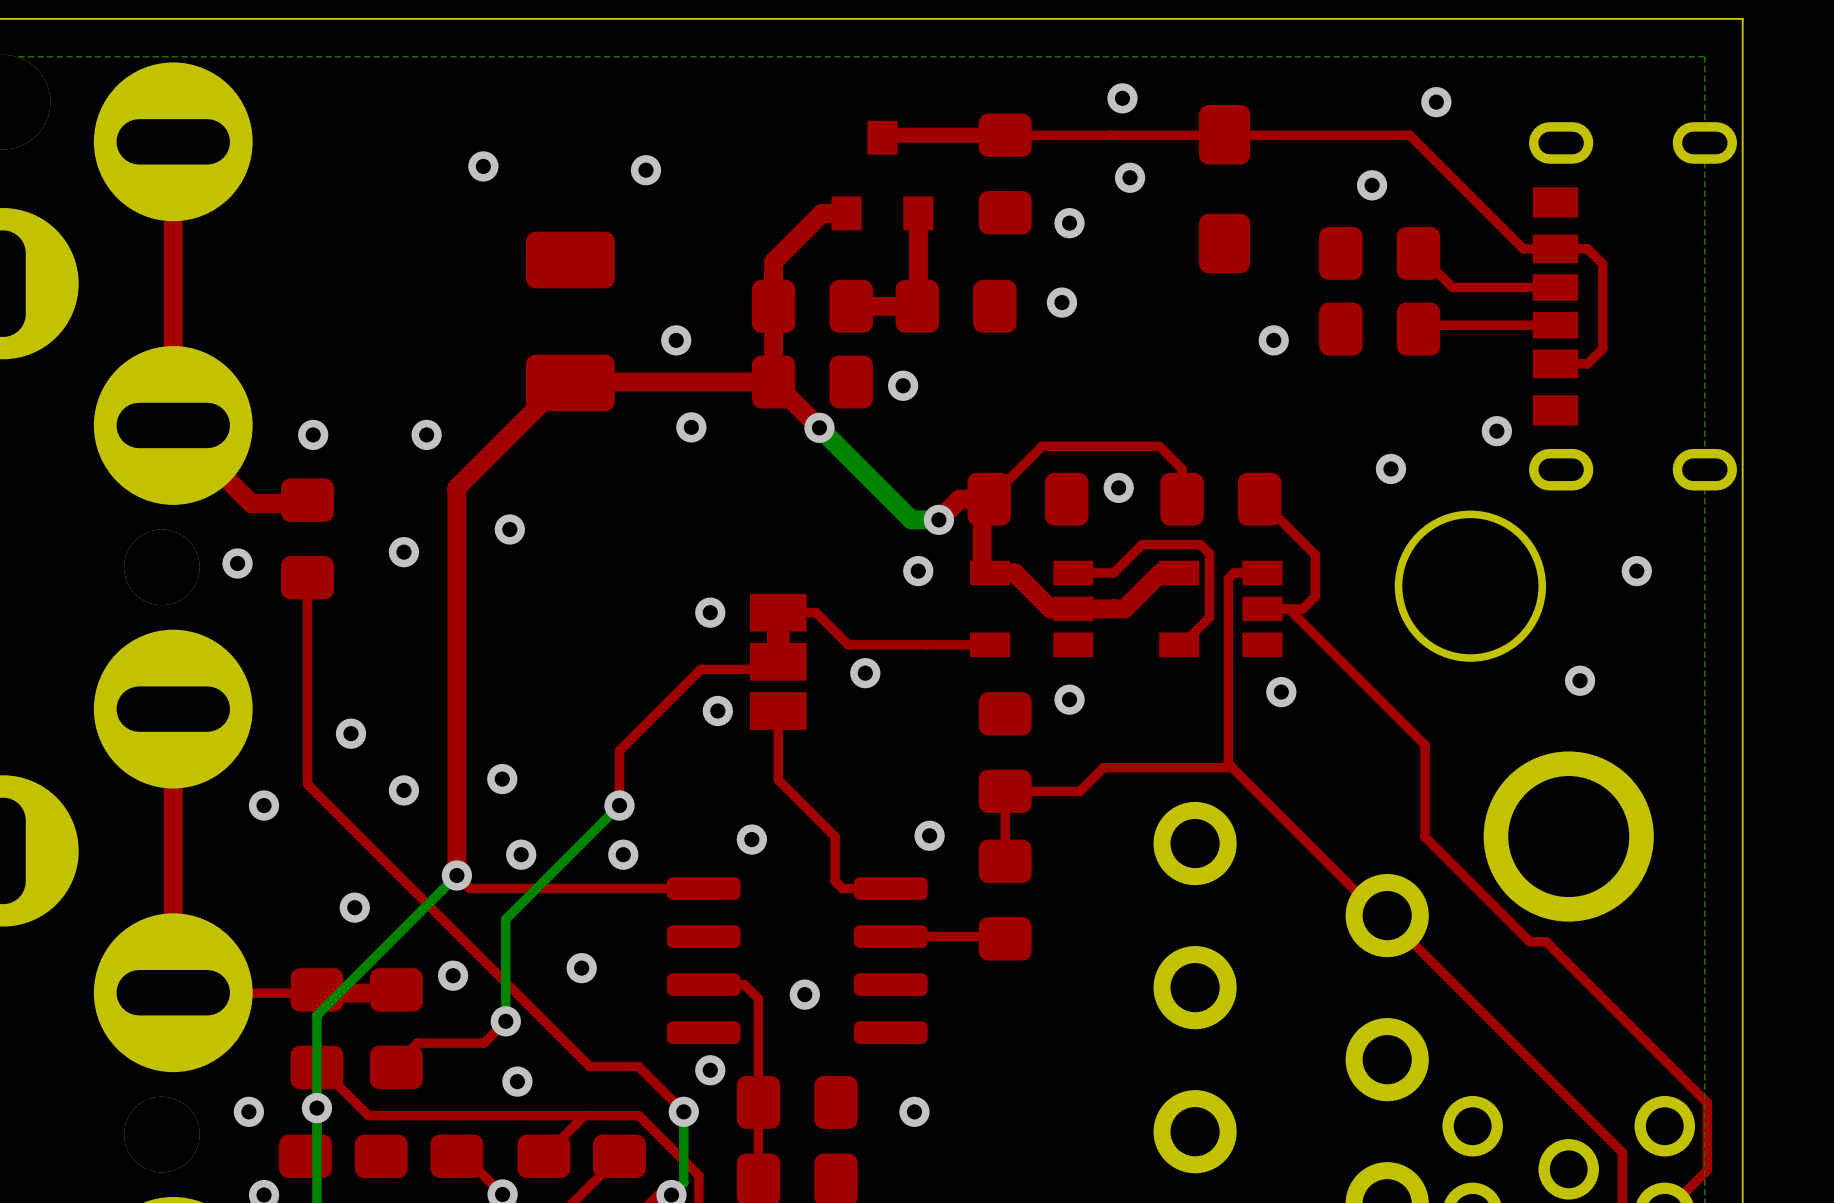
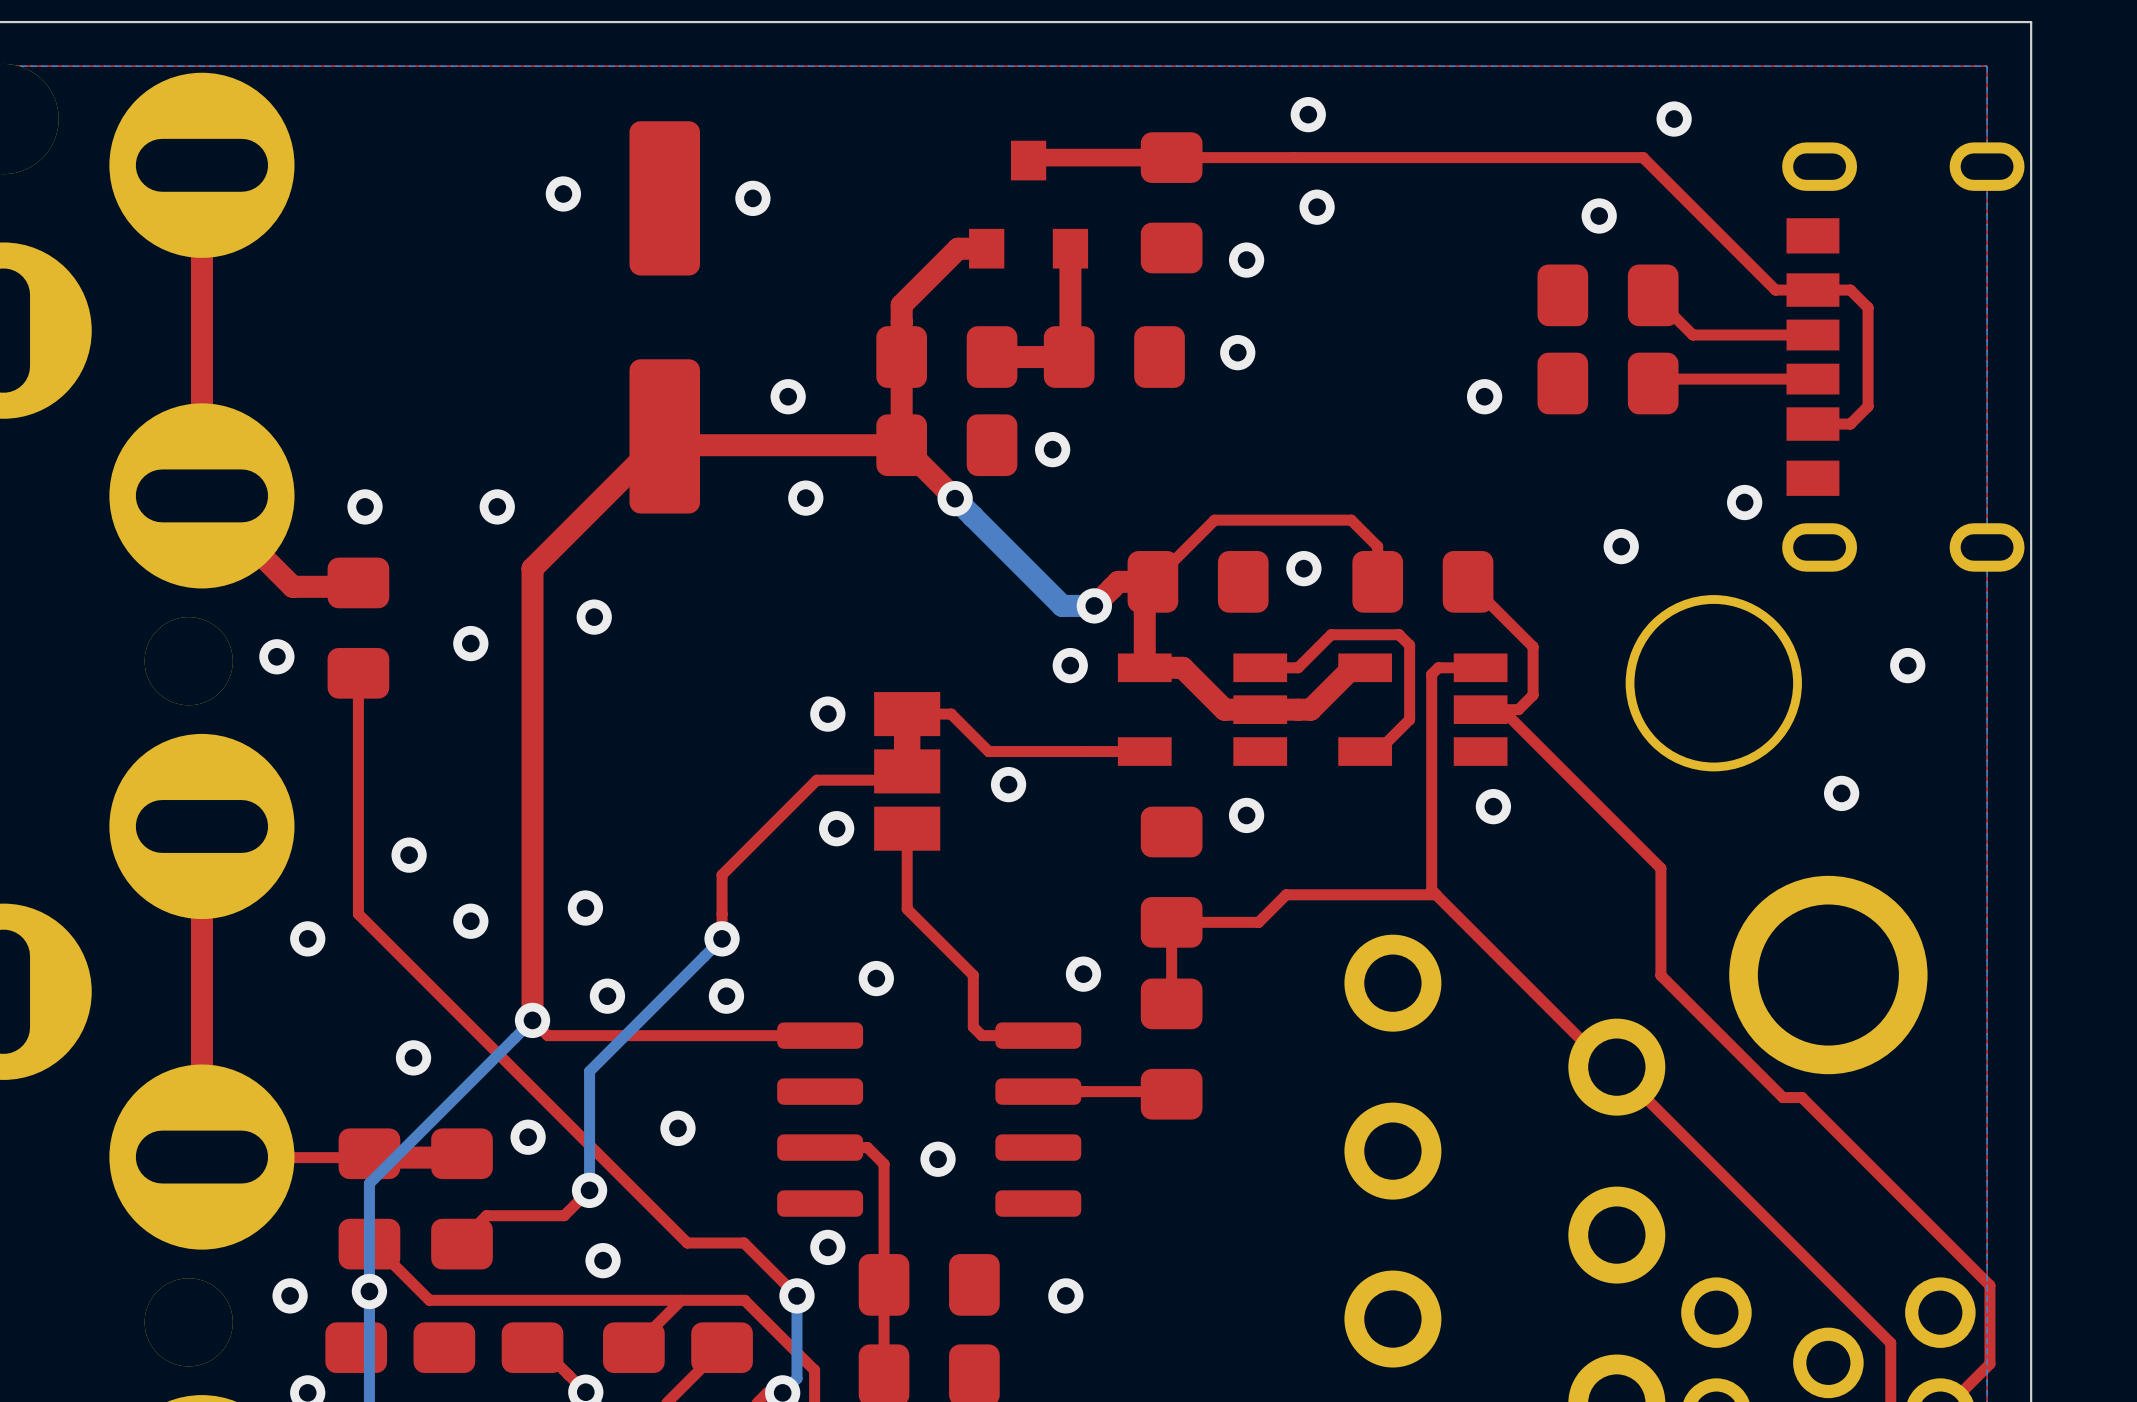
part: (1224, 189) -> none
part: none -> (664, 317)
part: (570, 321) -> none
part footprint: [970, 560, 1094, 658] -> [1117, 653, 1288, 766]
part footprint: [1159, 560, 1283, 658] -> [1338, 653, 1508, 766]

